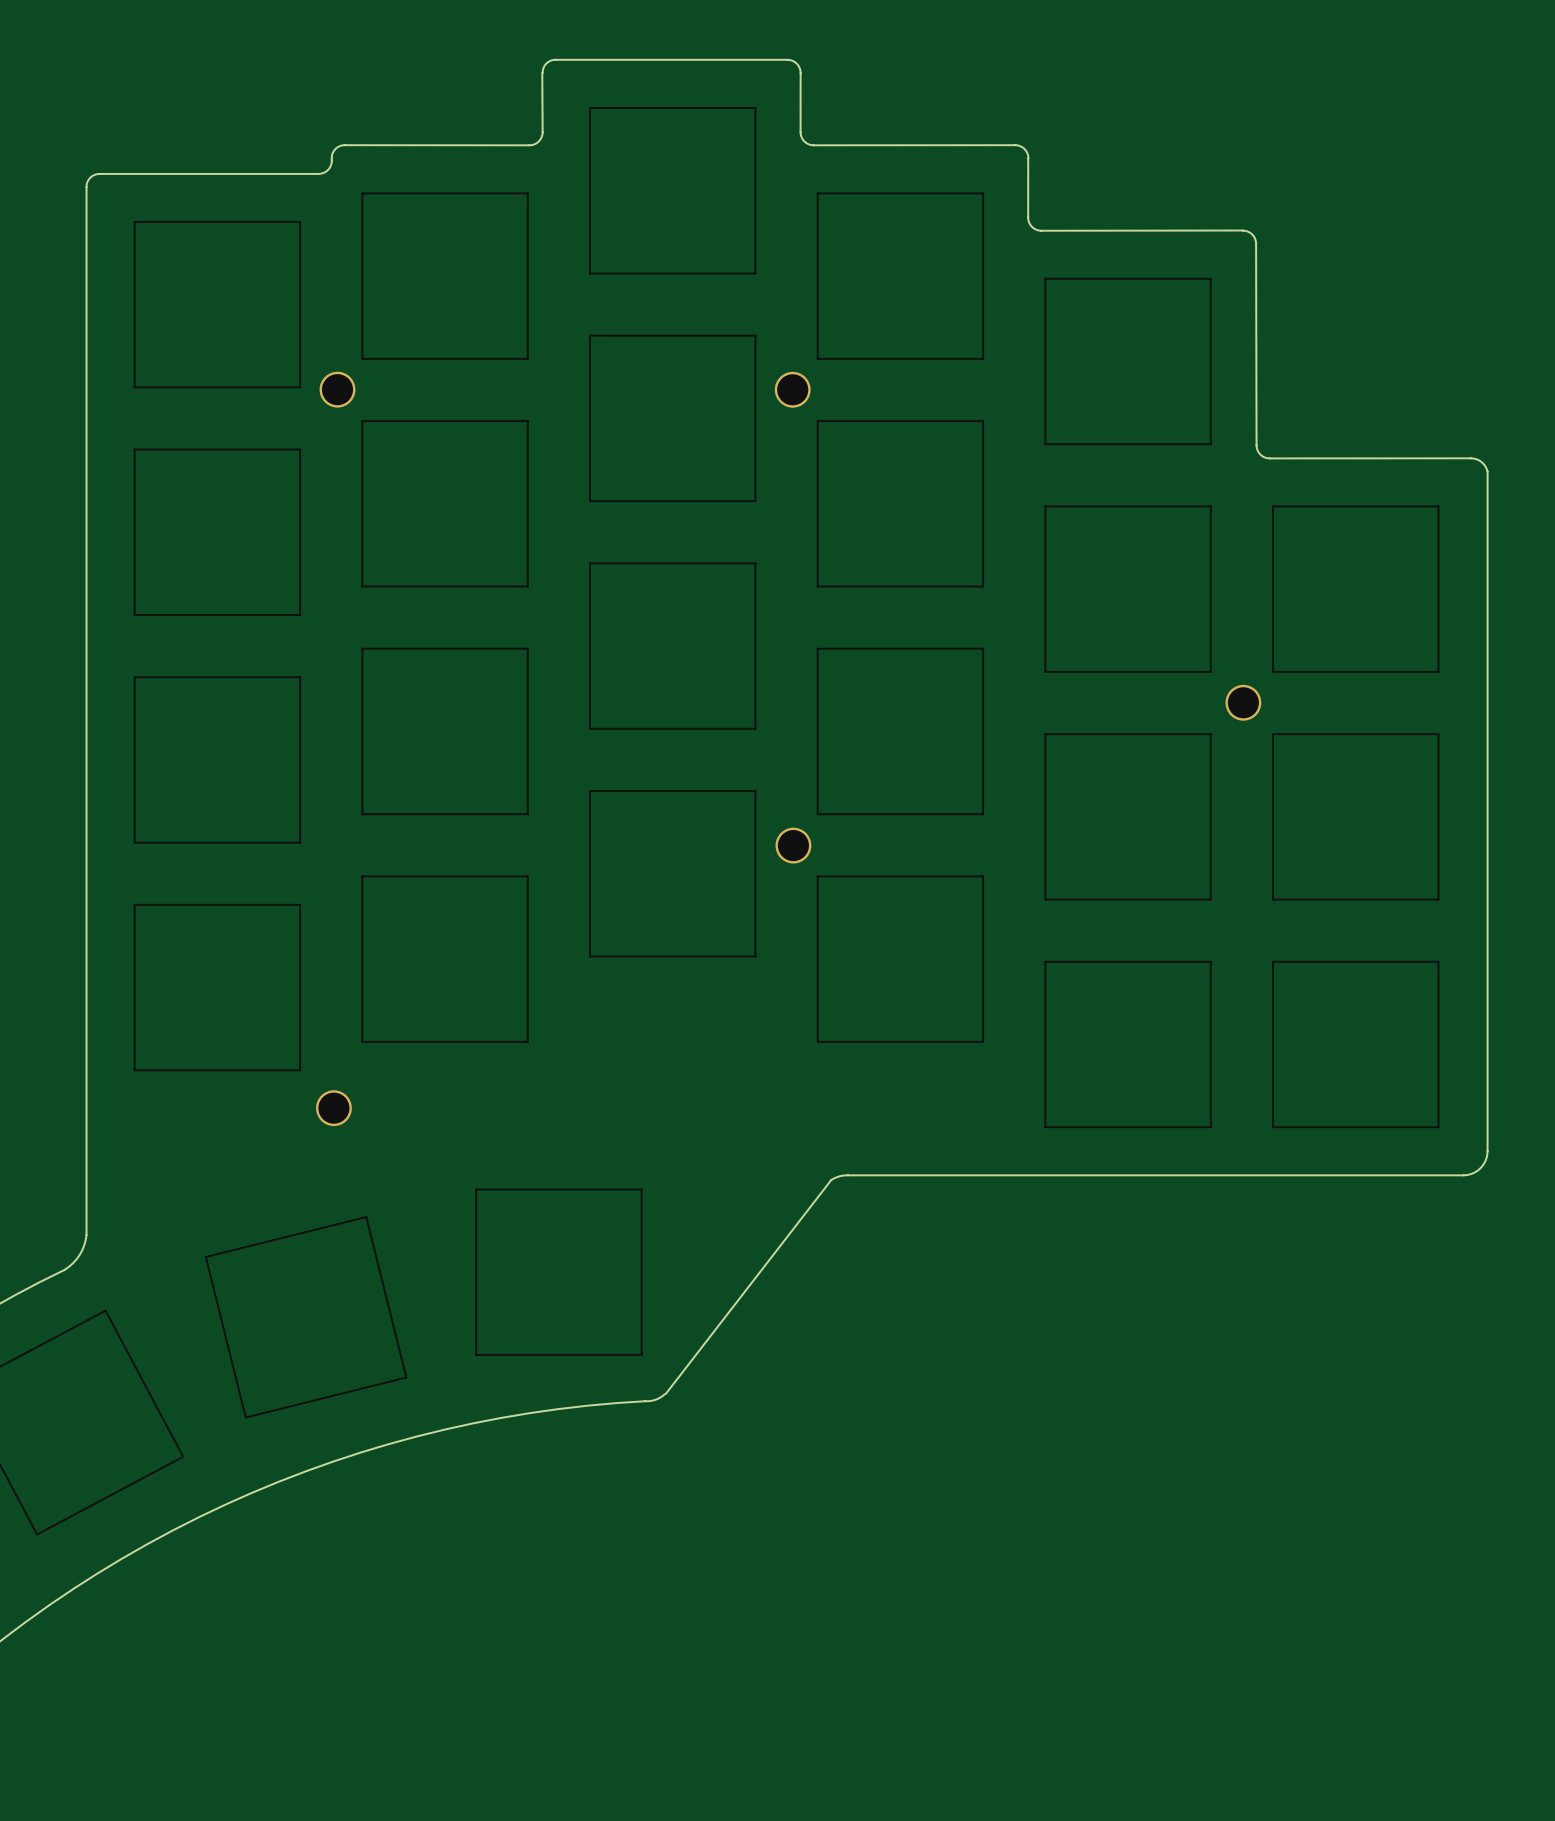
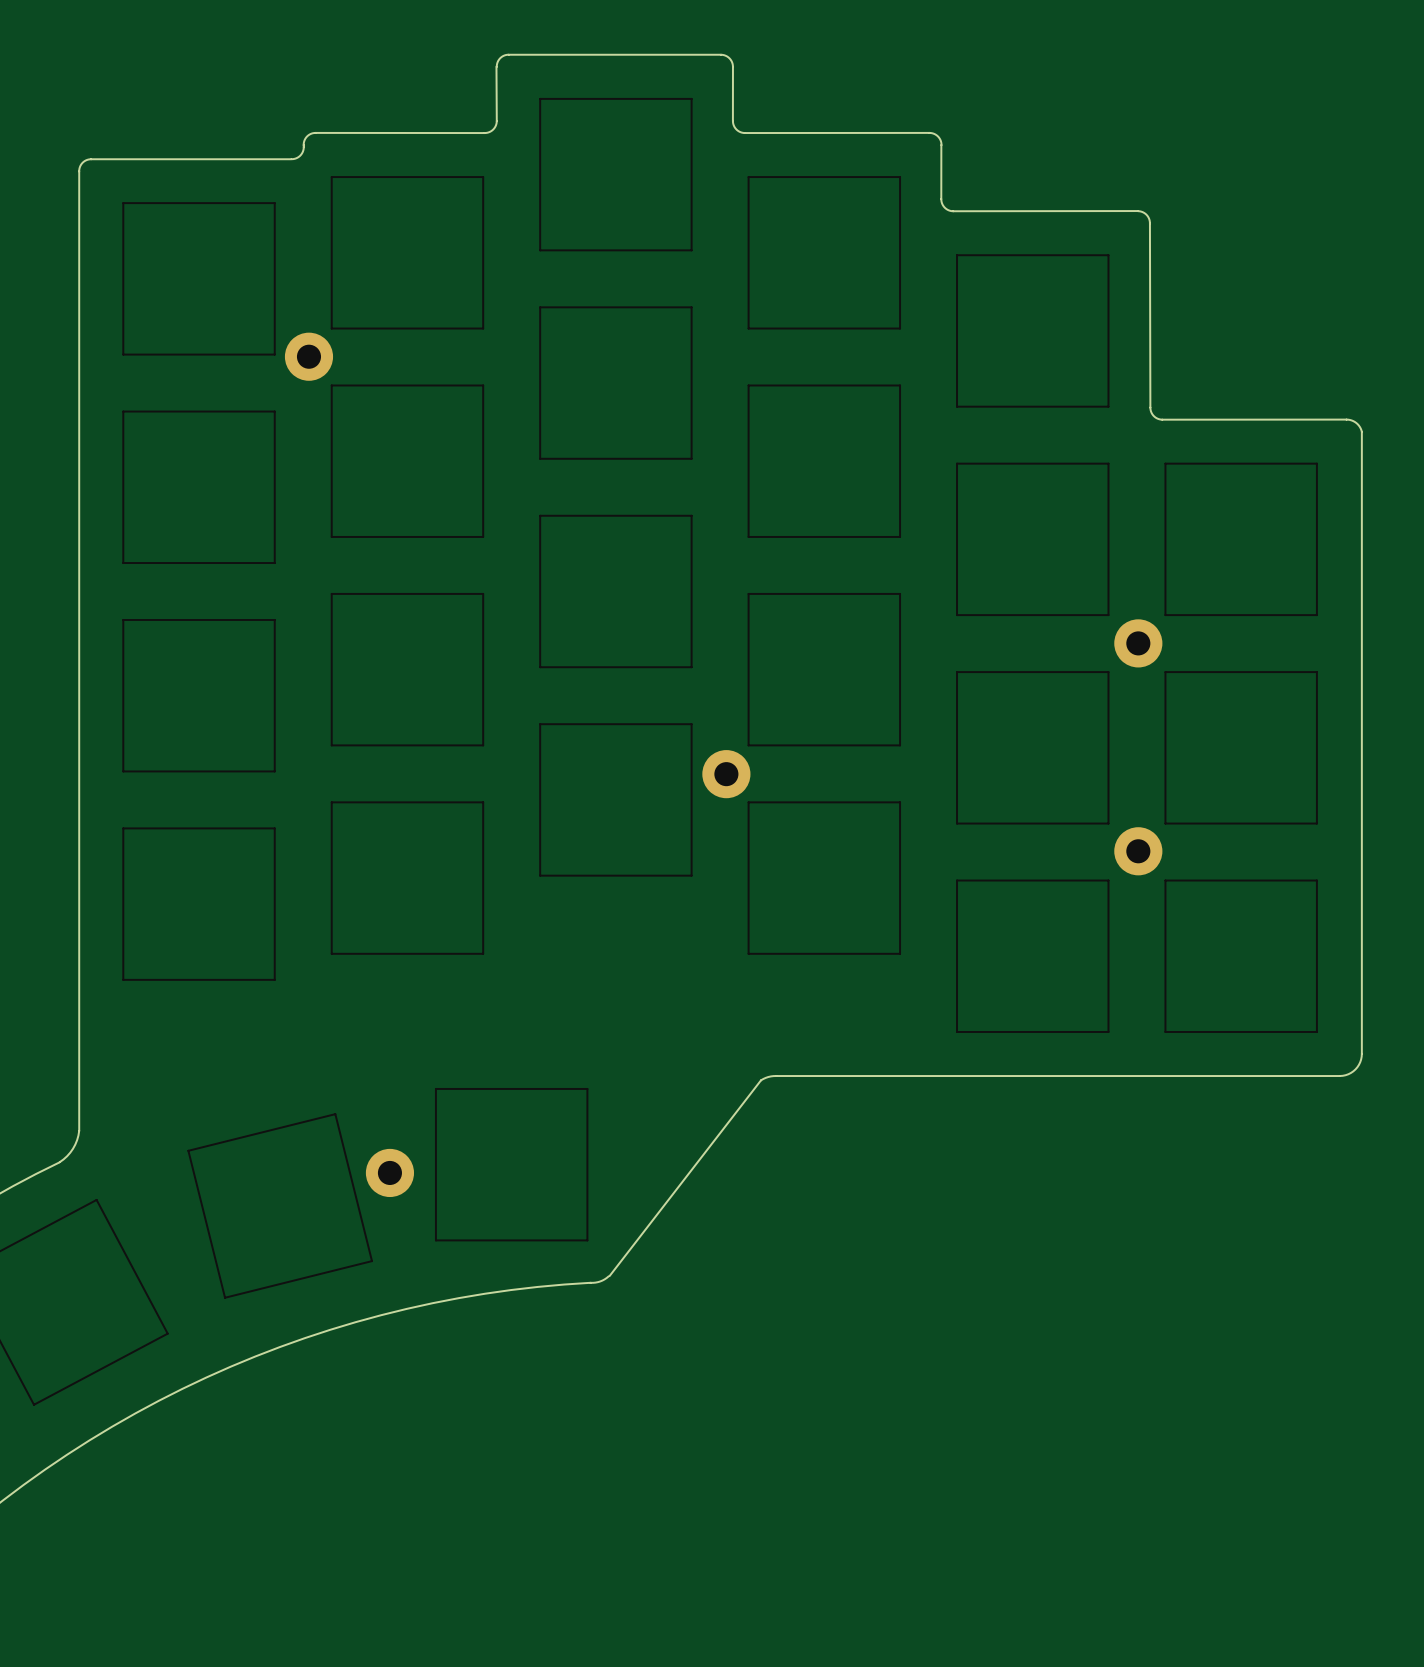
part footprint: [319, 371, 356, 408] -> [284, 332, 334, 381]
part: (792, 389) -> none
part footprint: [1225, 684, 1262, 721] -> [1114, 619, 1163, 668]
part footprint: [775, 827, 812, 864] -> [702, 750, 751, 799]
part: none -> (1138, 851)
part: (333, 1108) -> none
part: none -> (389, 1172)

